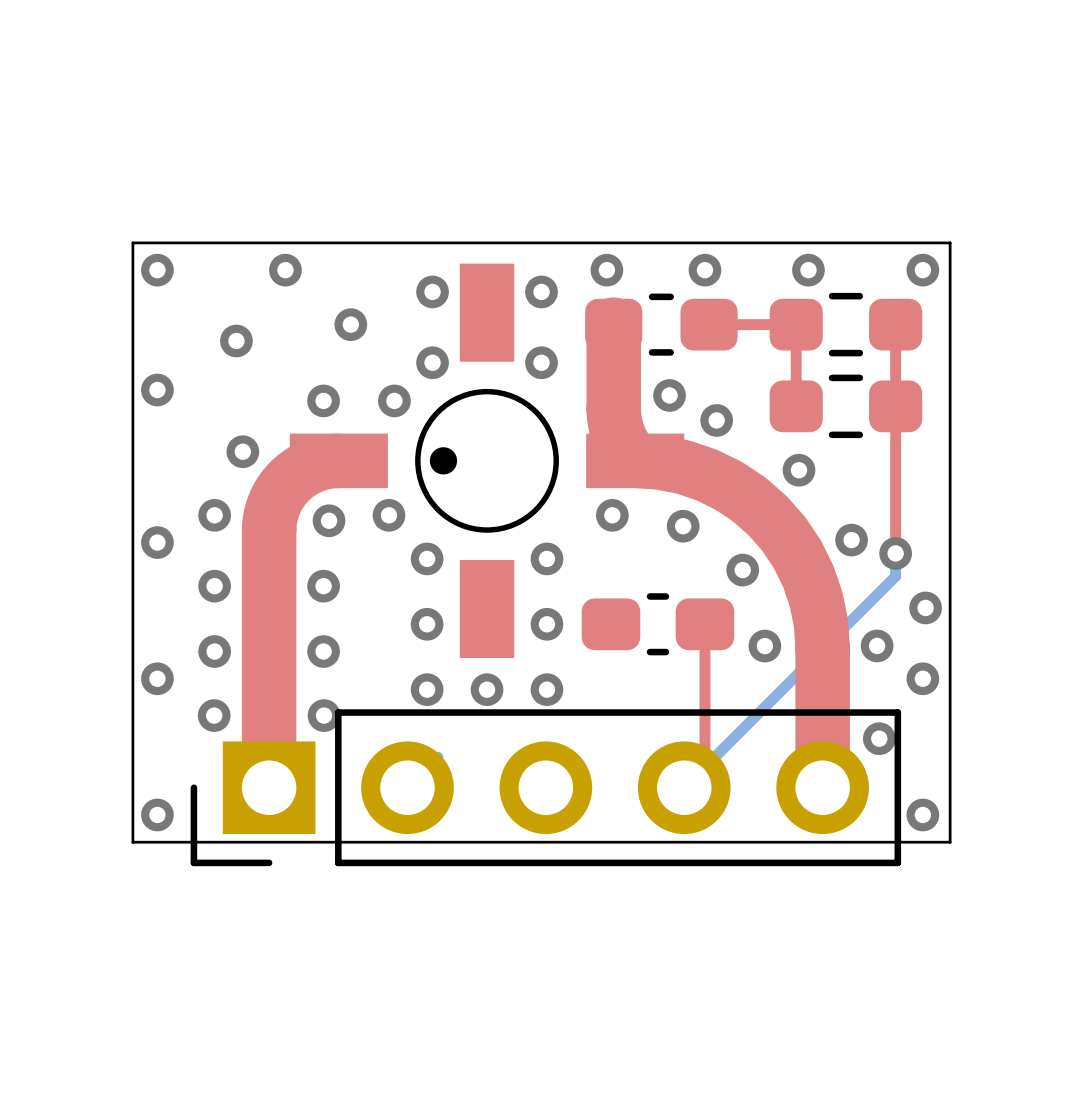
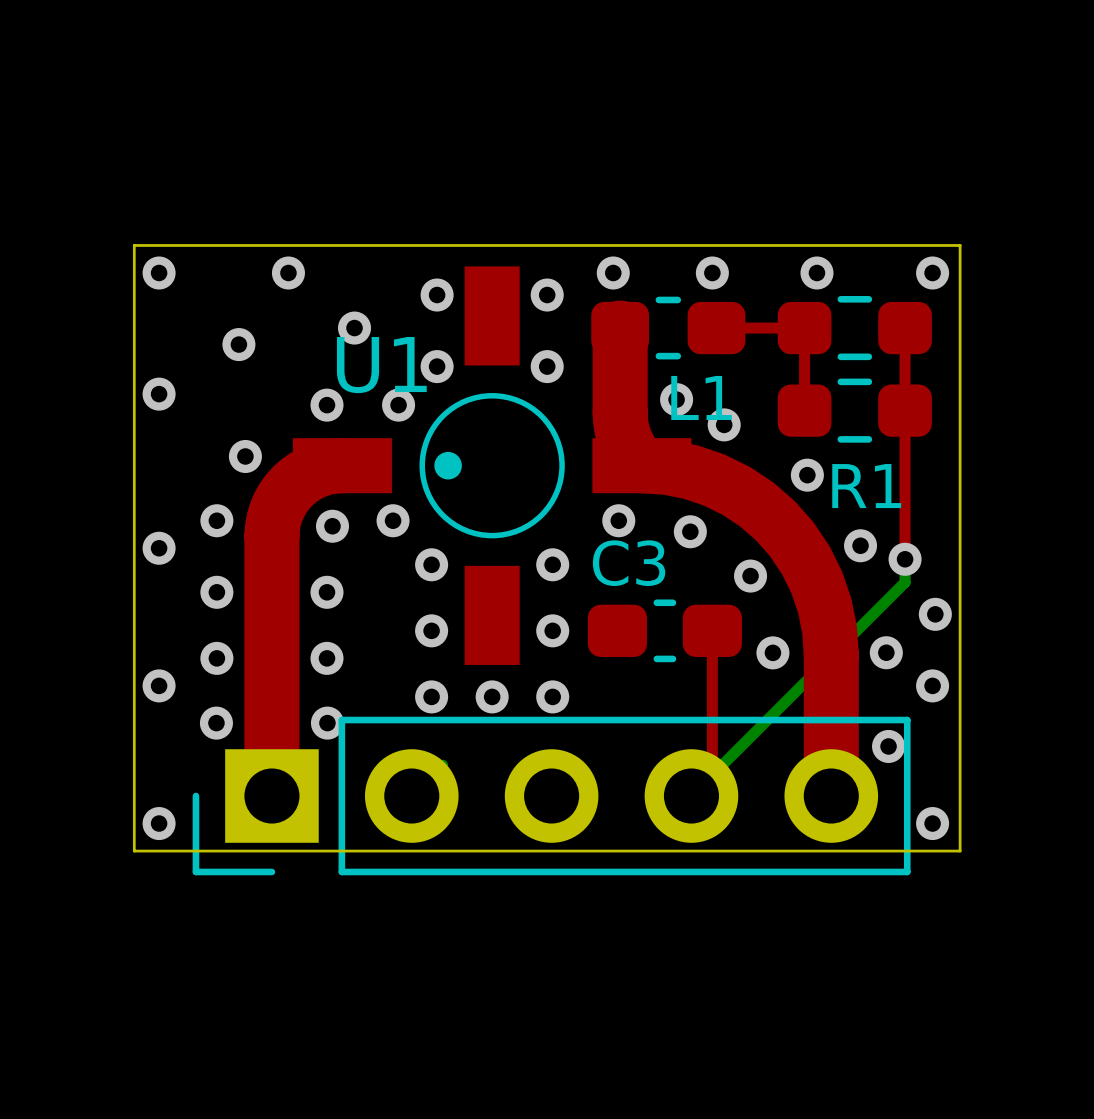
U1 name: none -> U1 (381, 365)
L1 name: none -> L1 (701, 397)
R1 name: none -> R1 (866, 486)
C3 name: none -> C3 (629, 563)

